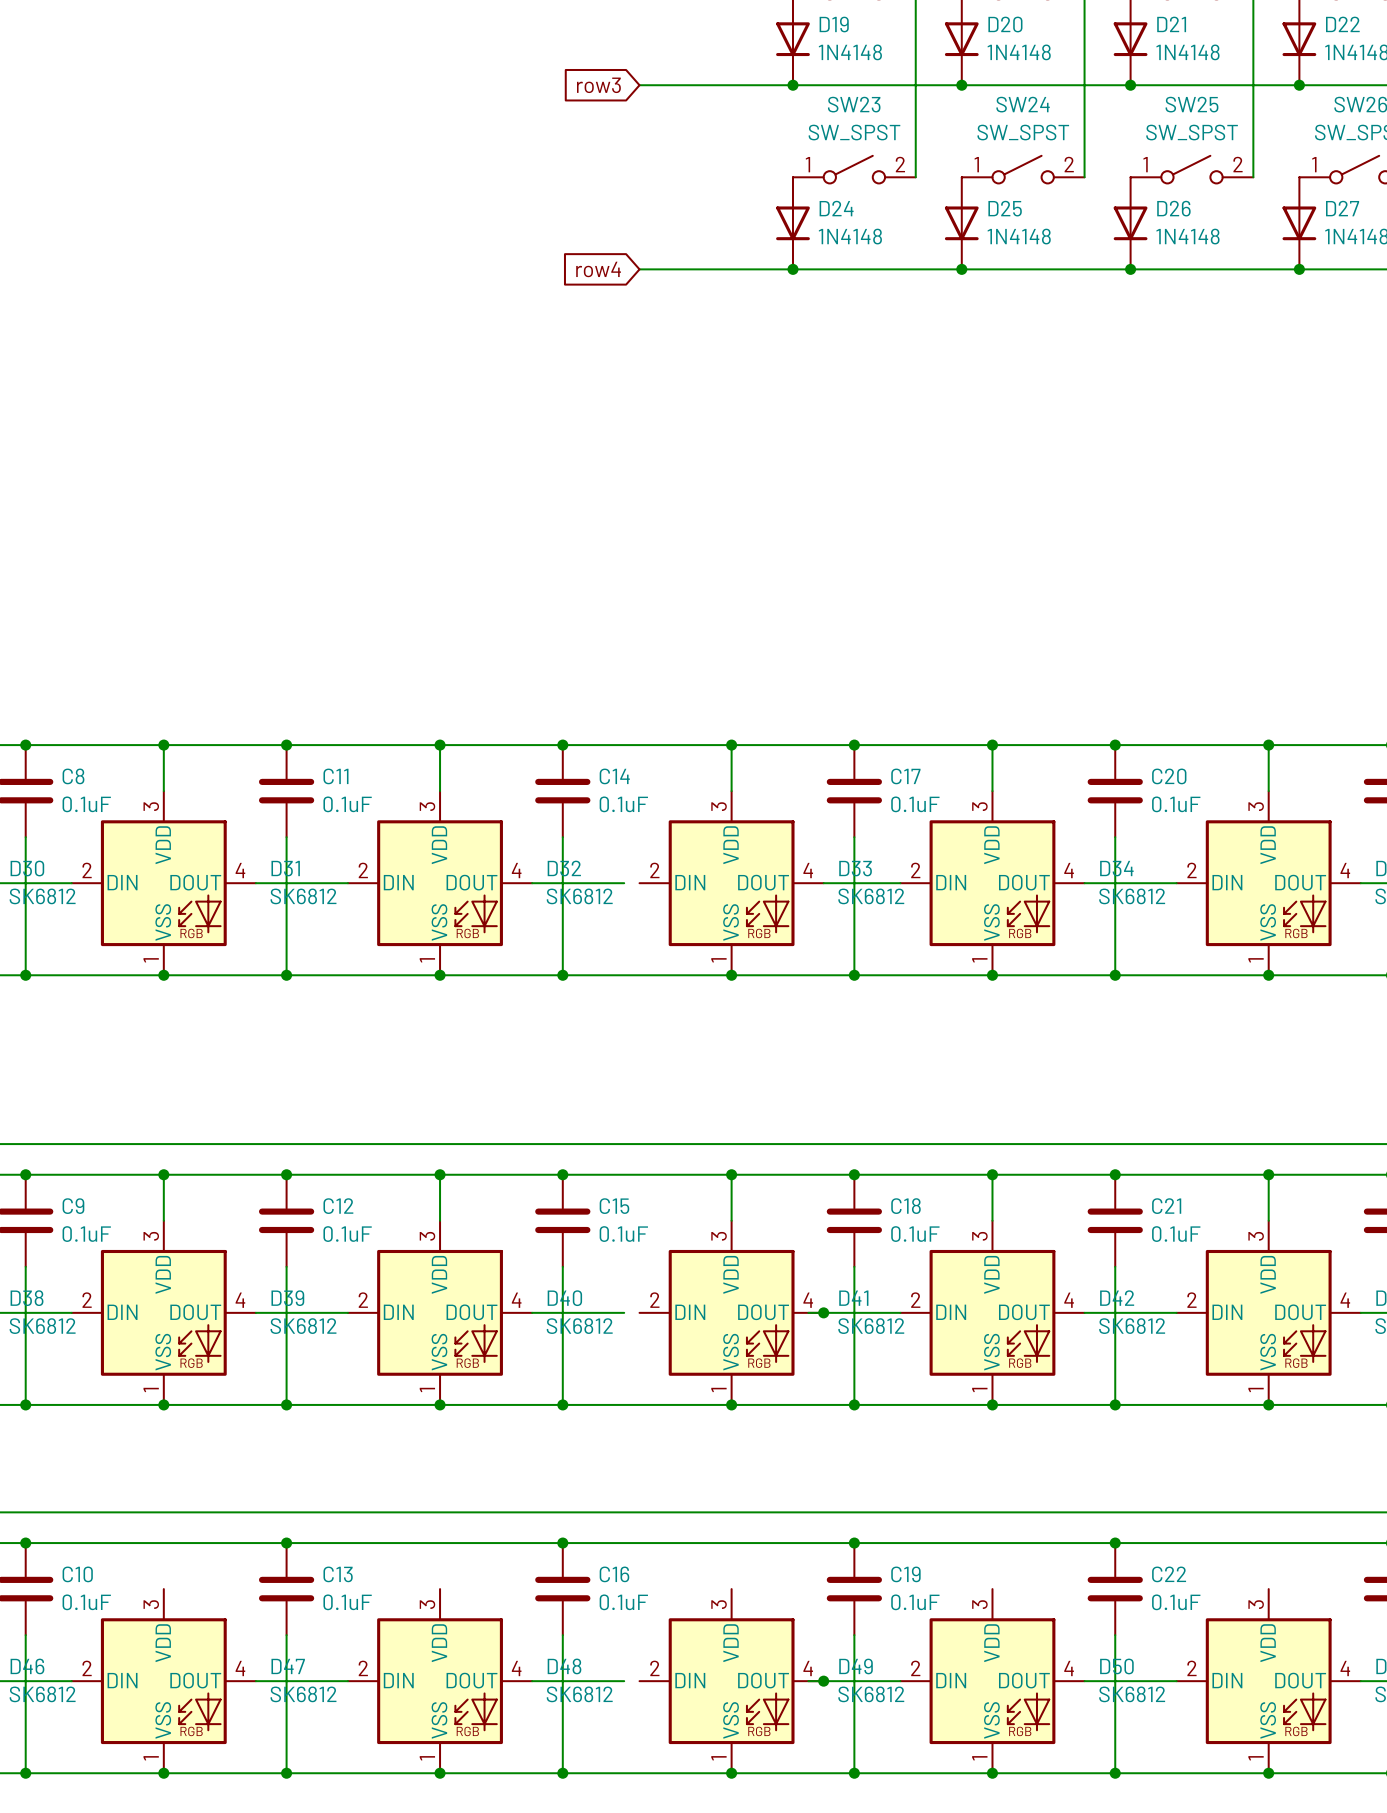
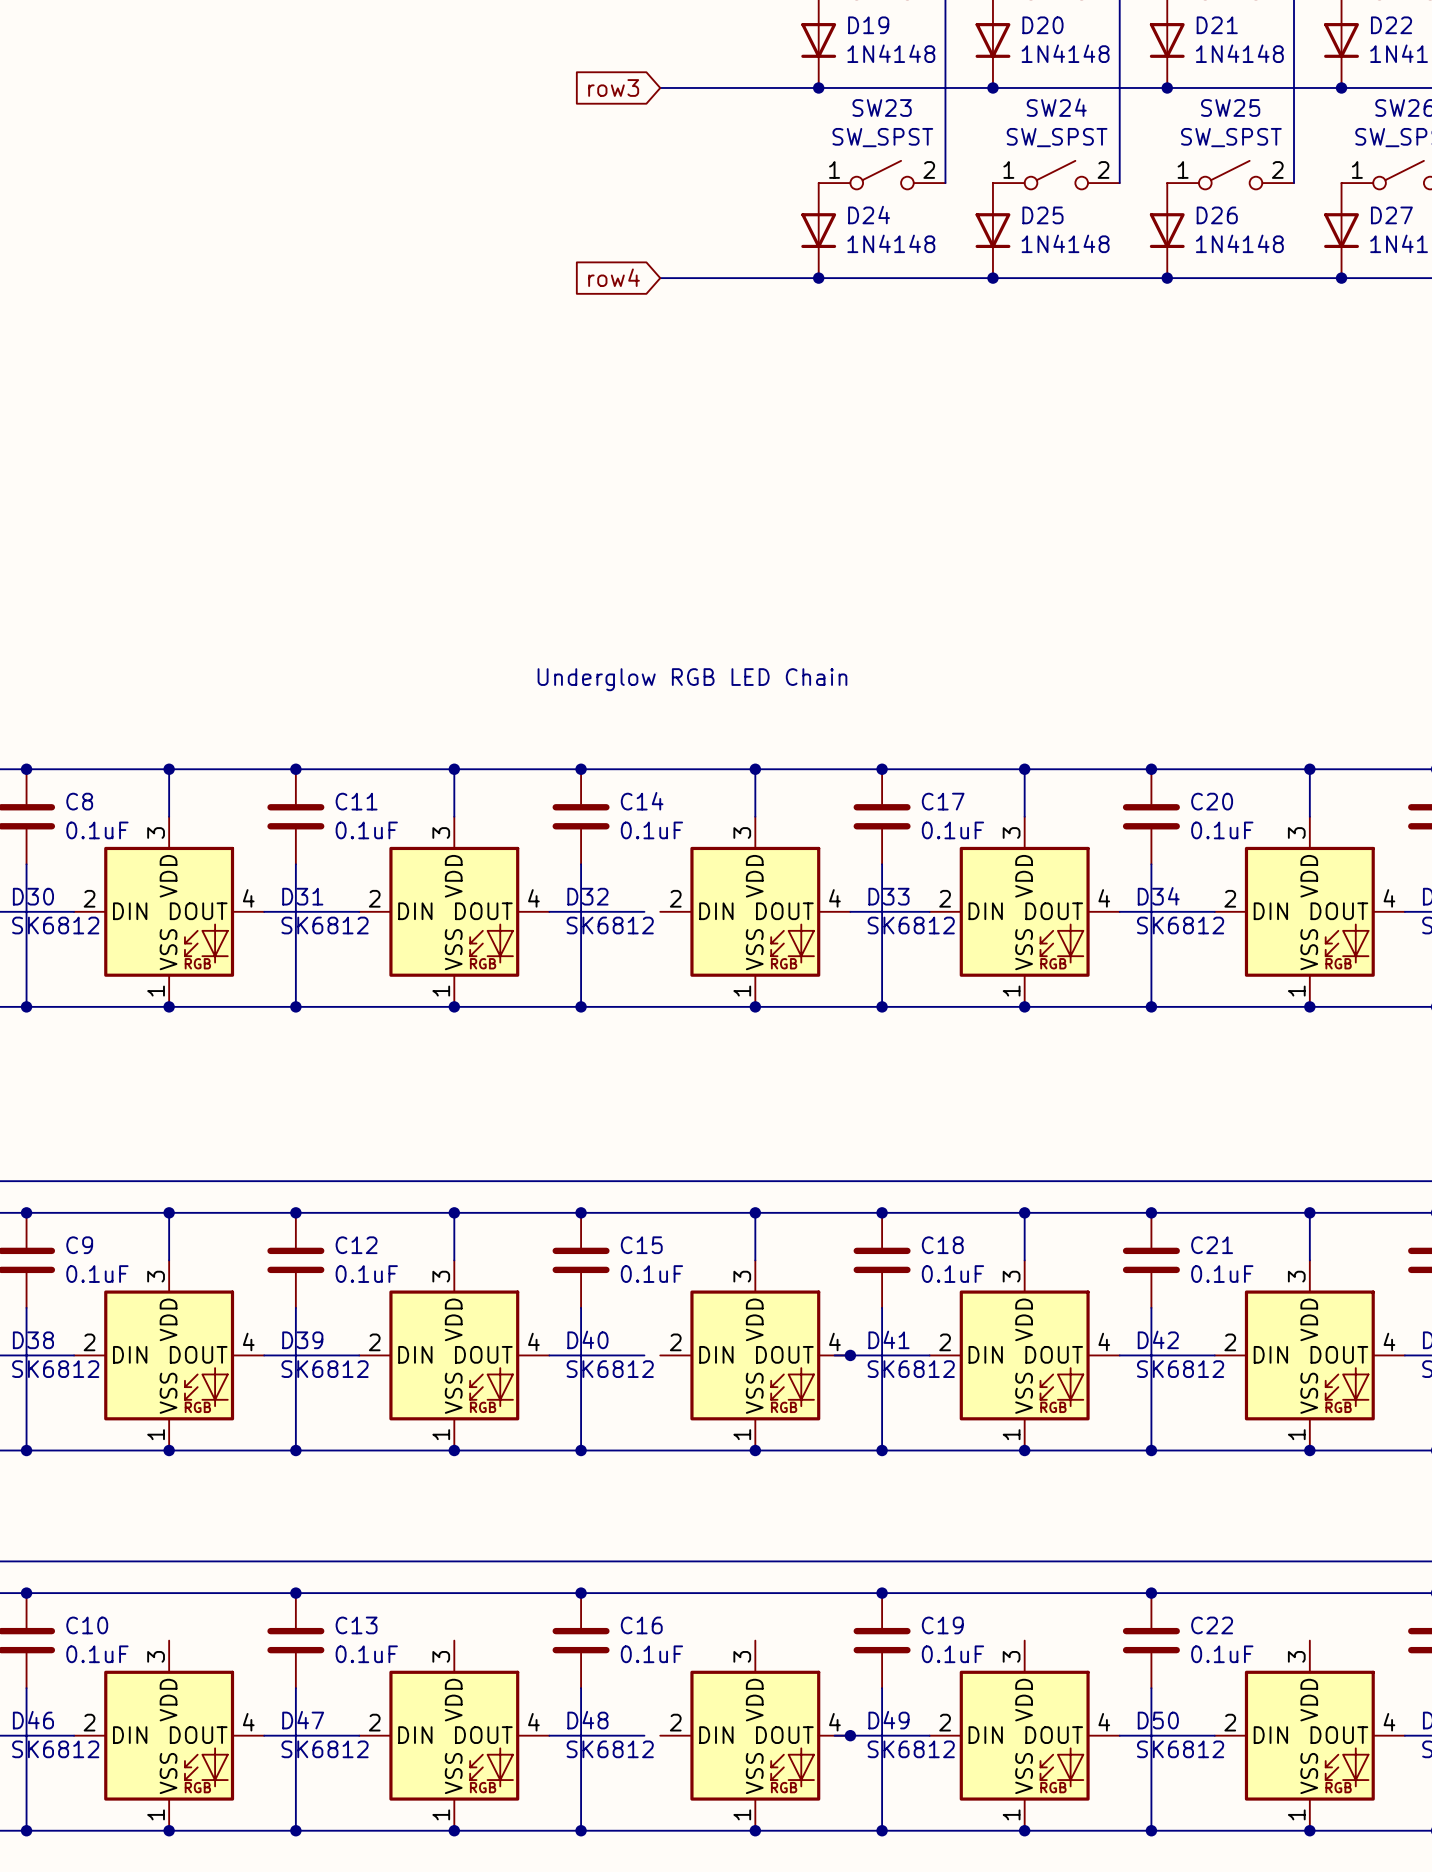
text: none -> Underglow RGB LED Chain (692, 679)

